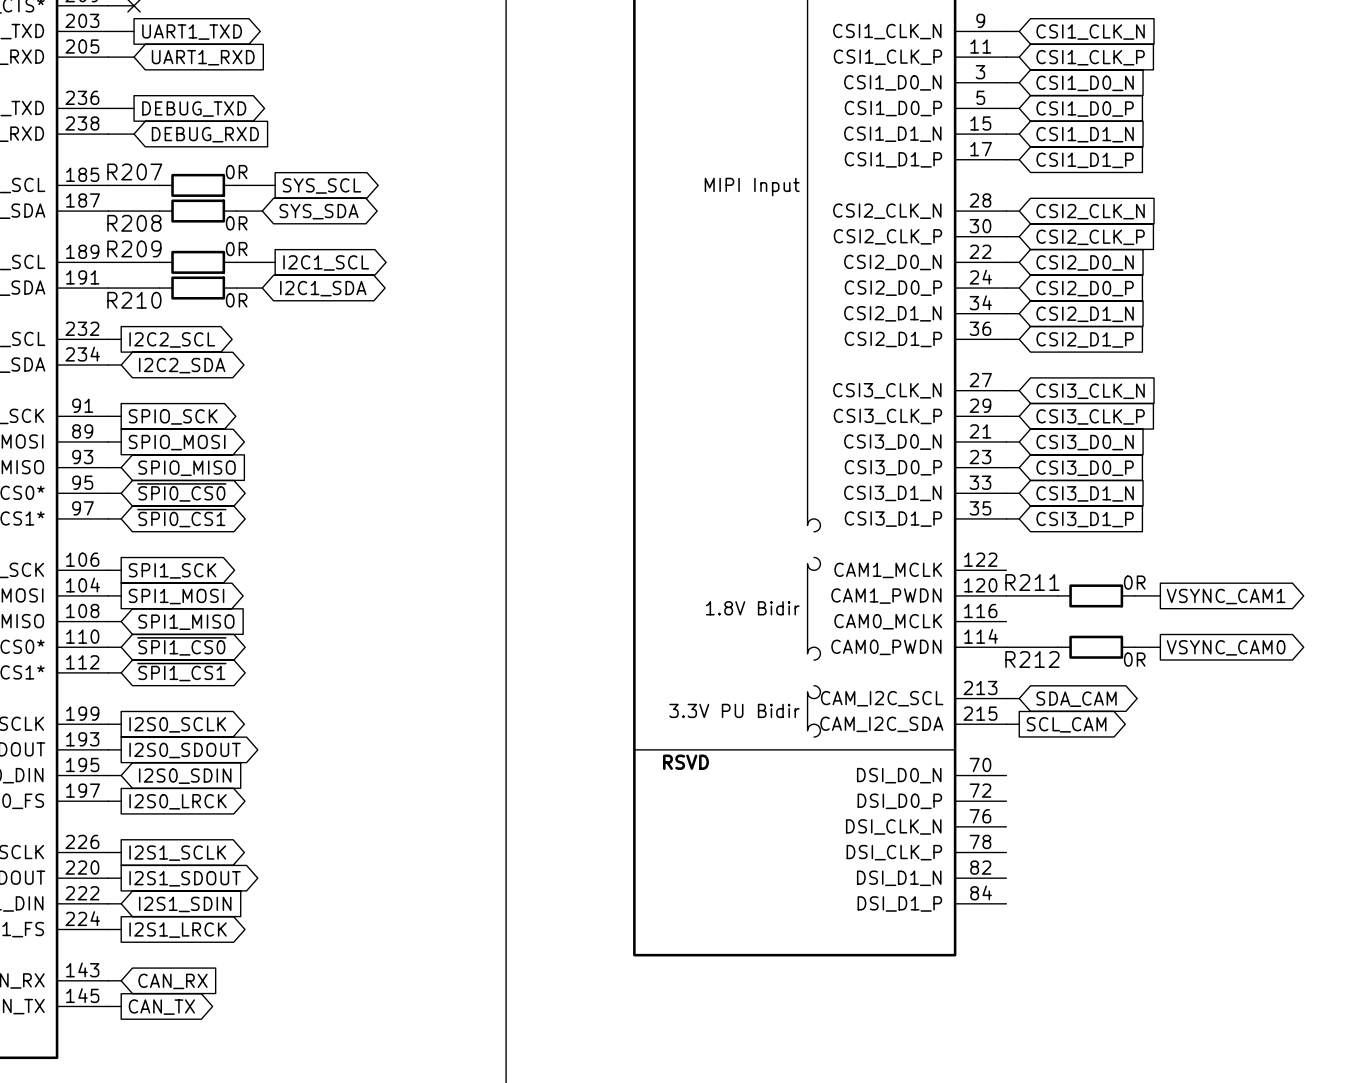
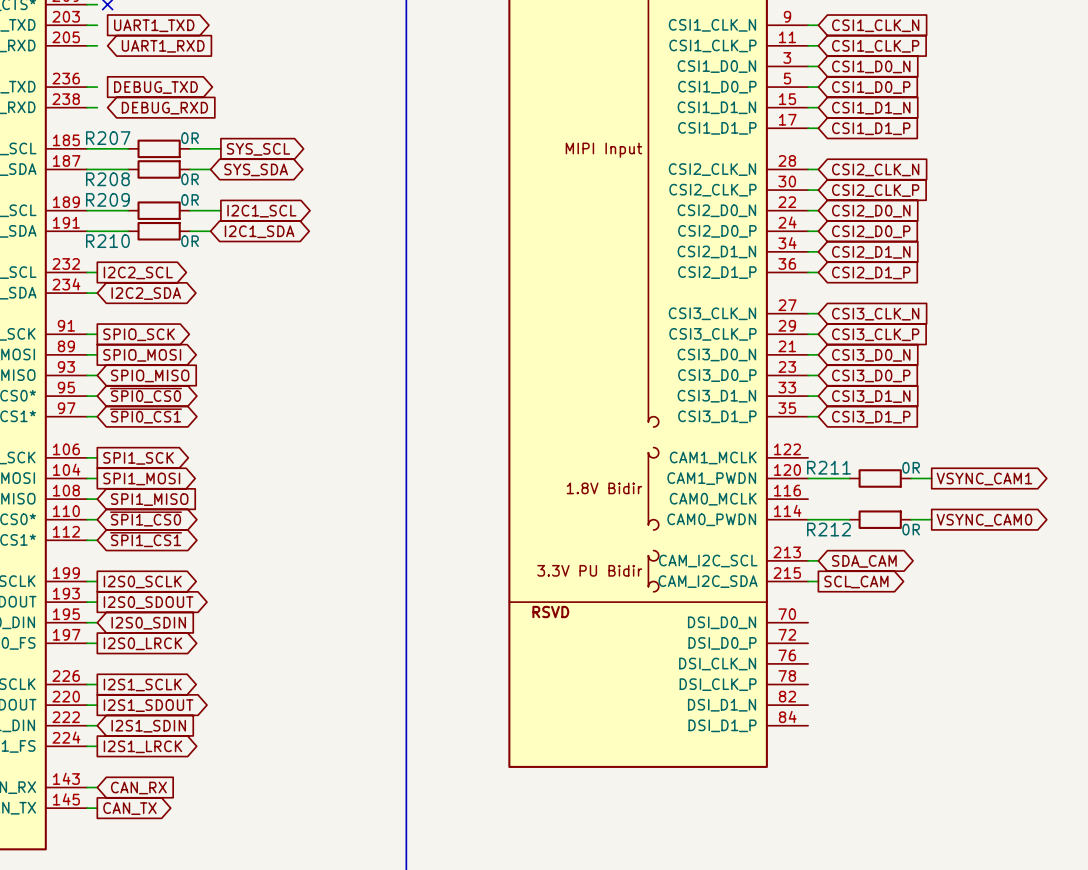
wire: (121, 5) (134, 5) -> none
wire: (121, 31) (134, 31) -> none
wire: (121, 57) (134, 57) -> none
wire: (121, 108) (134, 108) -> none
wire: (121, 134) (134, 134) -> none

